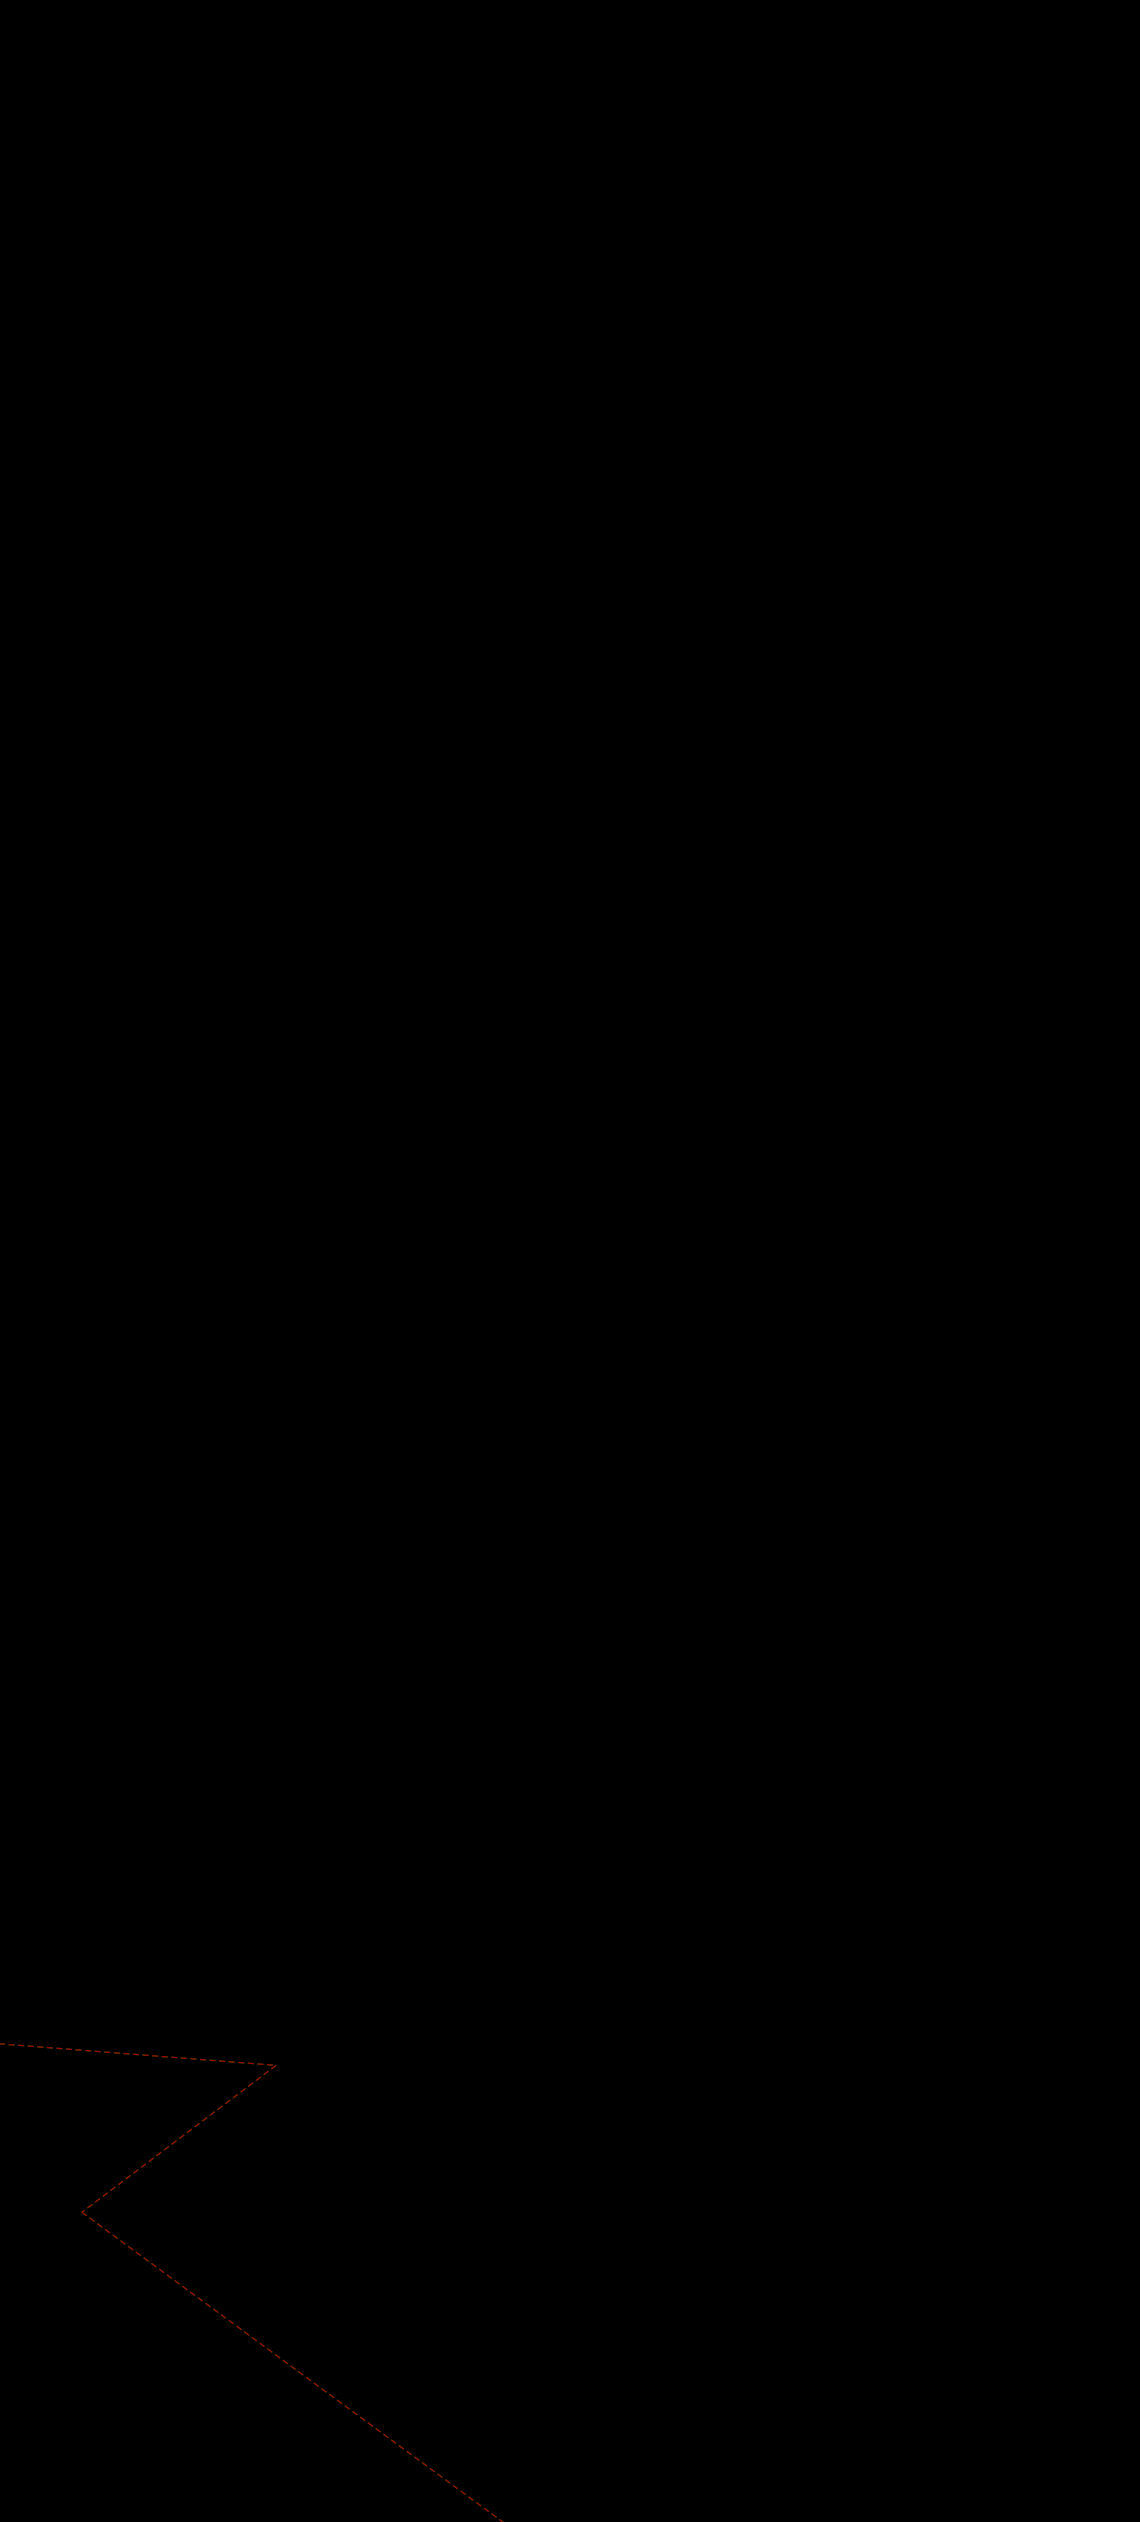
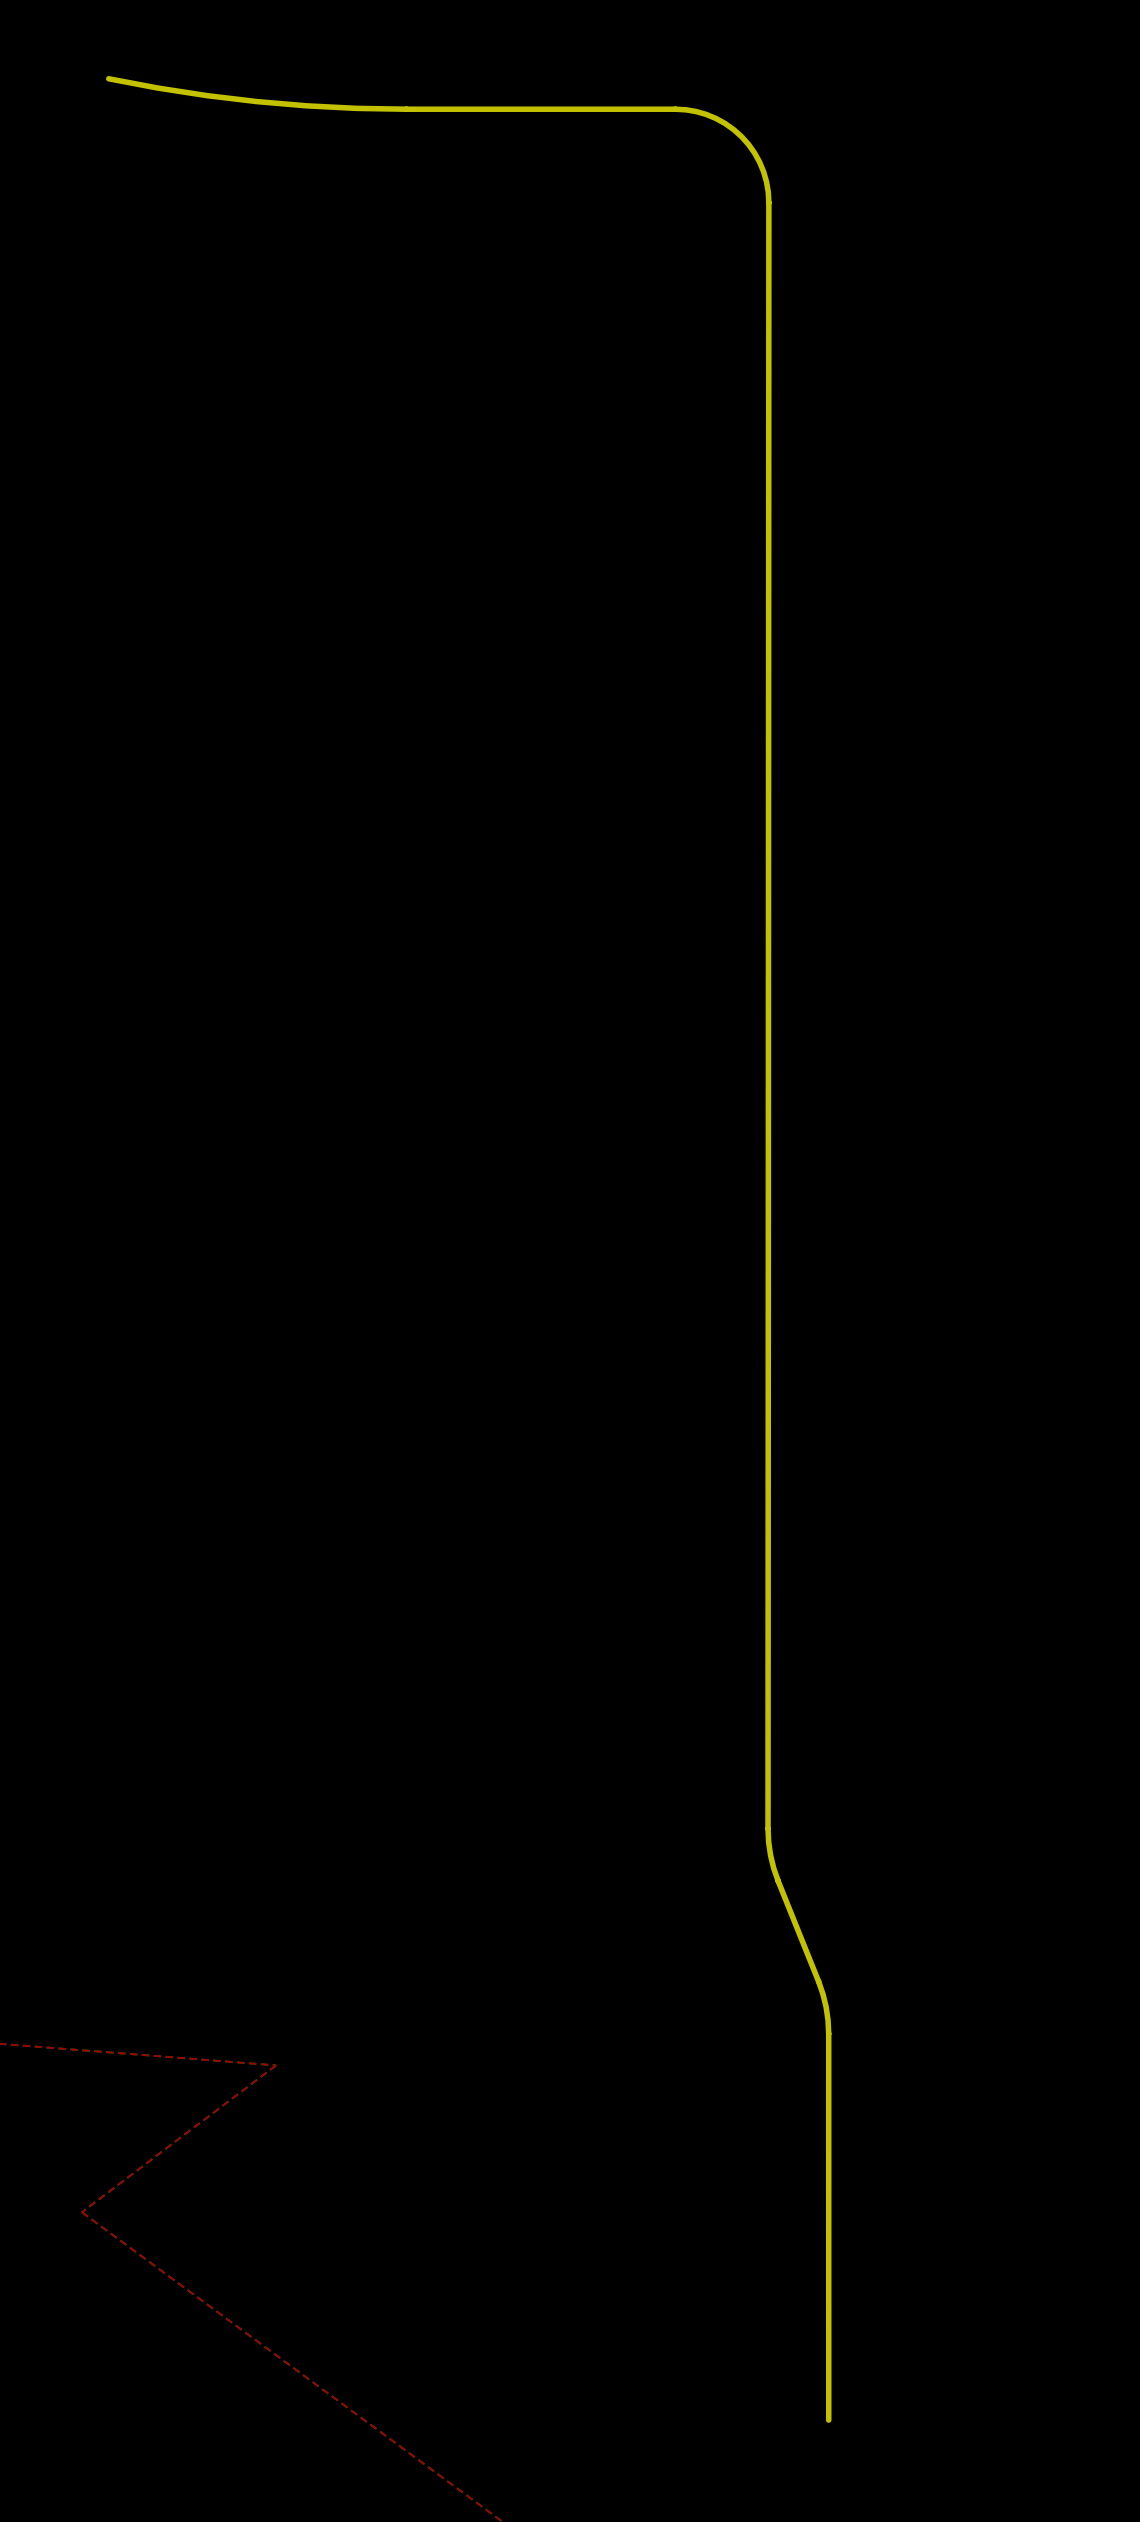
board edge: none -> (108, 78) (207, 95) (306, 105) (406, 109) (685, 109) (706, 114) (733, 129) (754, 152) (763, 171) (768, 202) (768, 1828) (773, 1868) (818, 1981) (828, 2020) (828, 2420)

